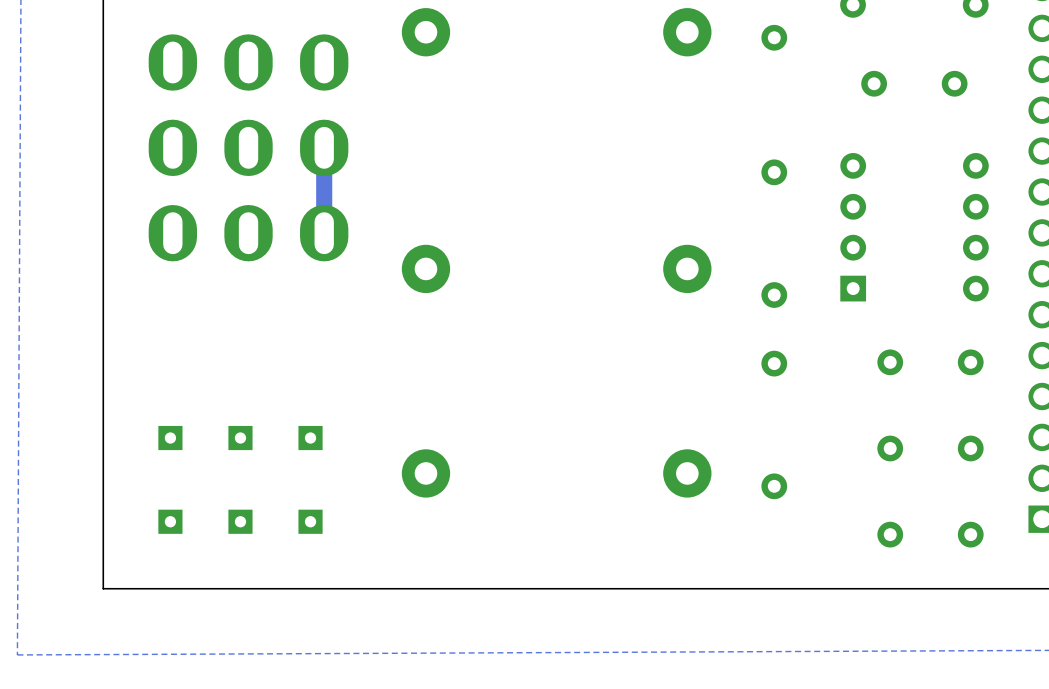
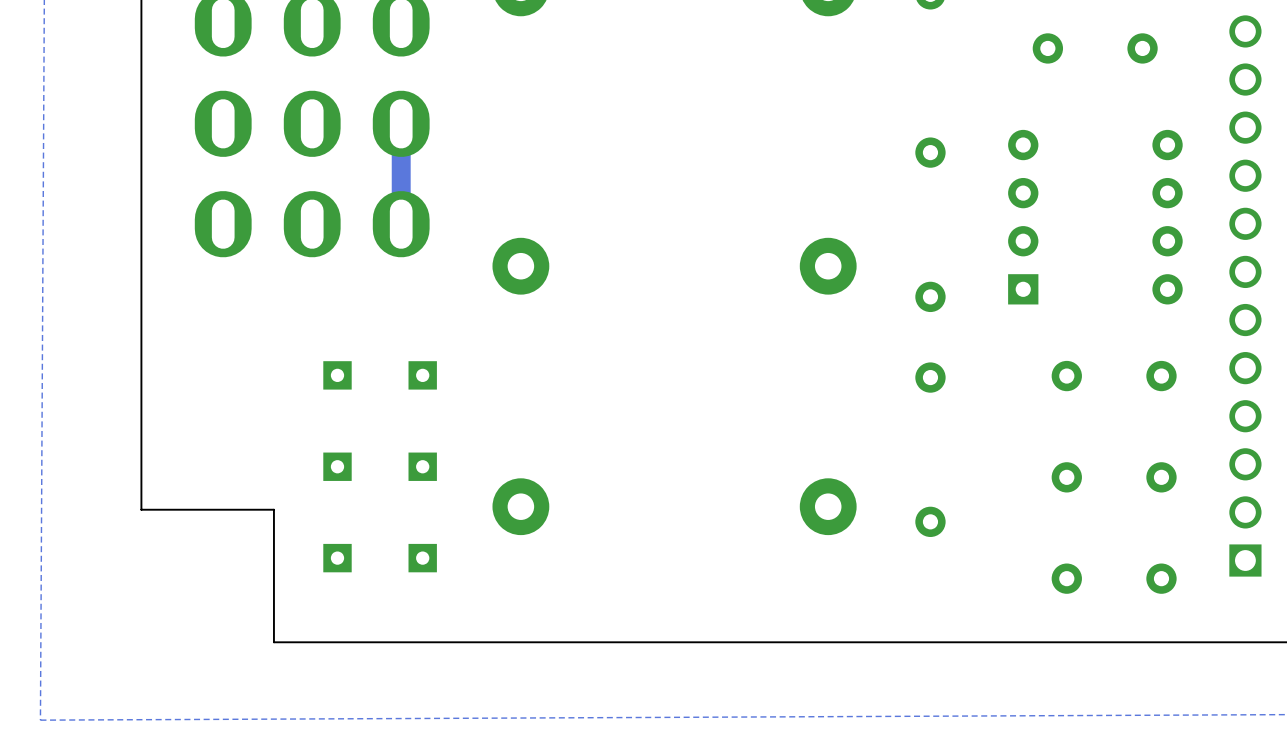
part: none -> (337, 375)
part: none -> (422, 375)
part: (170, 438) -> none
part: (240, 438) -> none
part: (310, 438) -> none
part: none -> (337, 466)
part: none -> (422, 466)
board edge: (103, 476) (103, 588) (216, 588) -> (141, 509) (273, 509) (273, 642)
part: none -> (337, 558)
part: none -> (422, 558)
part: (170, 521) -> none
part: (240, 521) -> none
part: (310, 521) -> none

